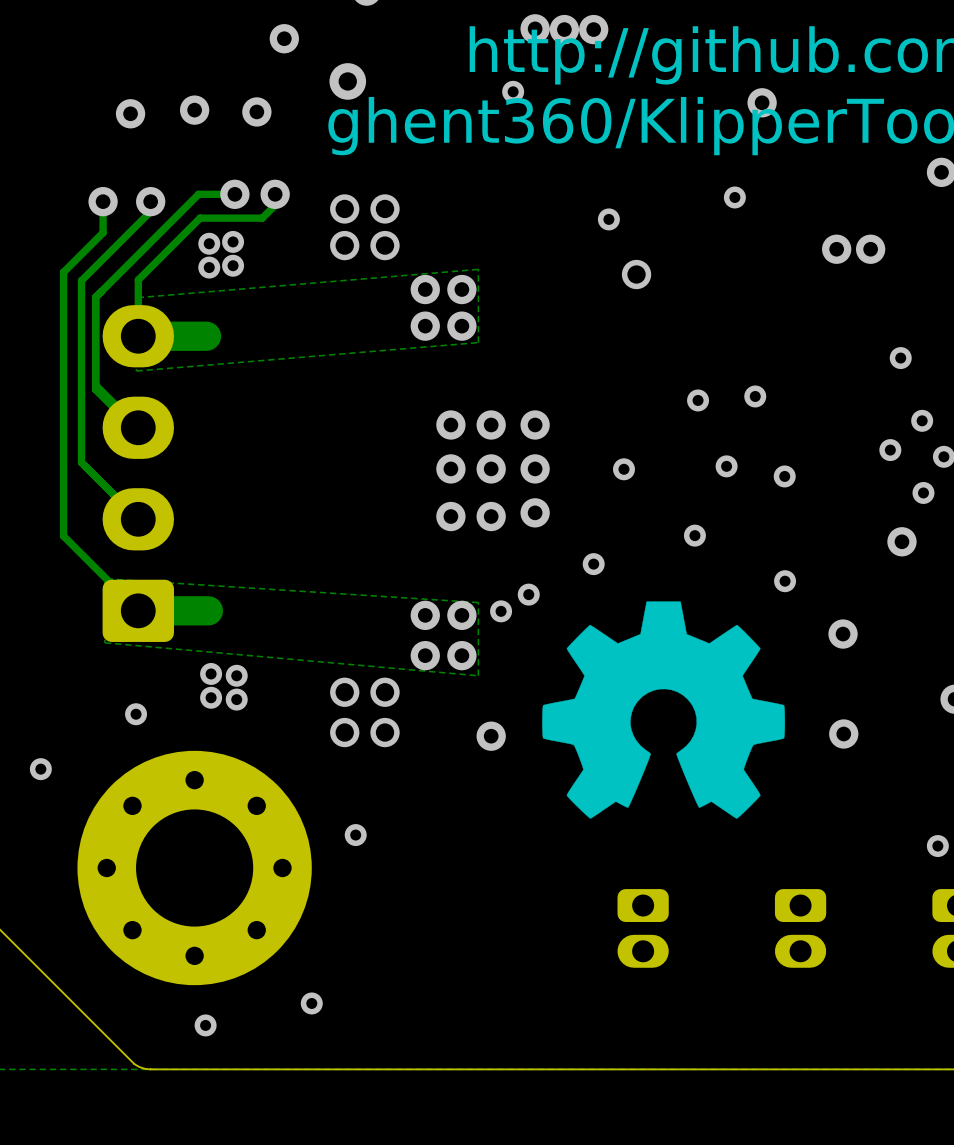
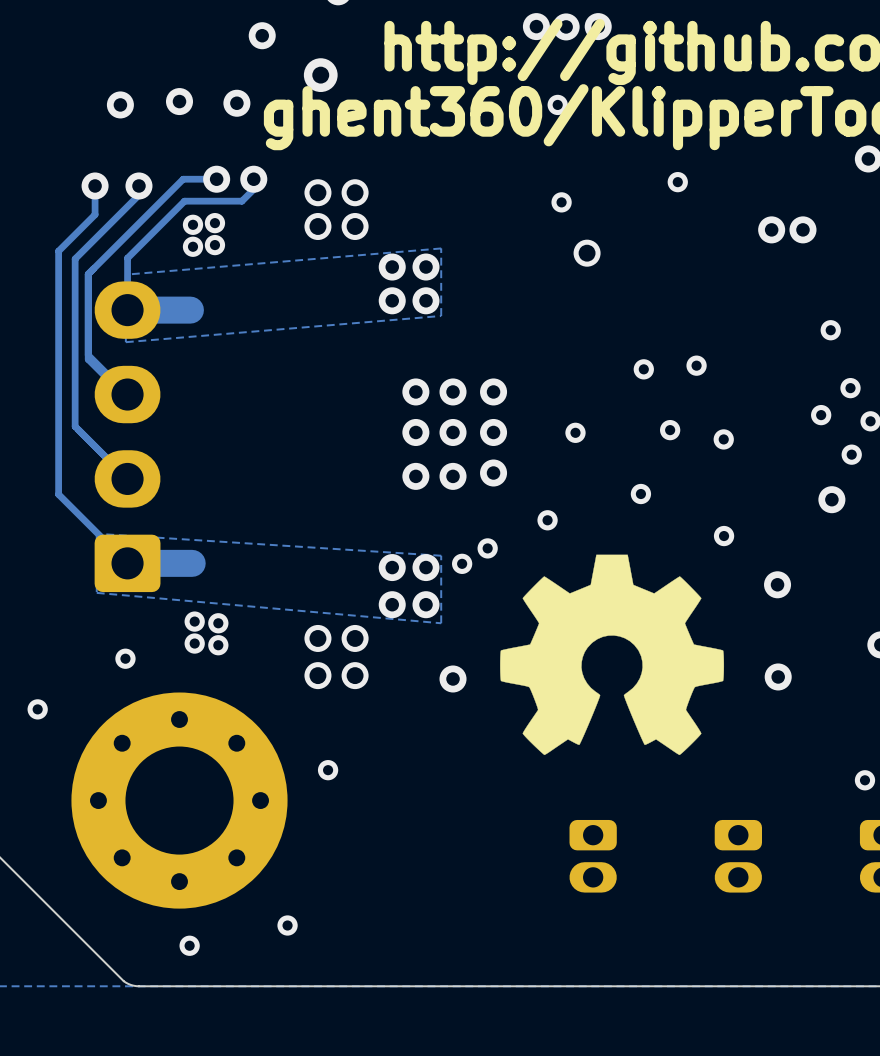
via: (535, 28) -> none
via: none -> (536, 26)
via: none -> (598, 26)
via: (564, 29) -> none
via: (593, 29) -> none
via: none -> (566, 26)
via: (513, 91) -> none
via: (762, 102) -> none
via: none -> (557, 104)

